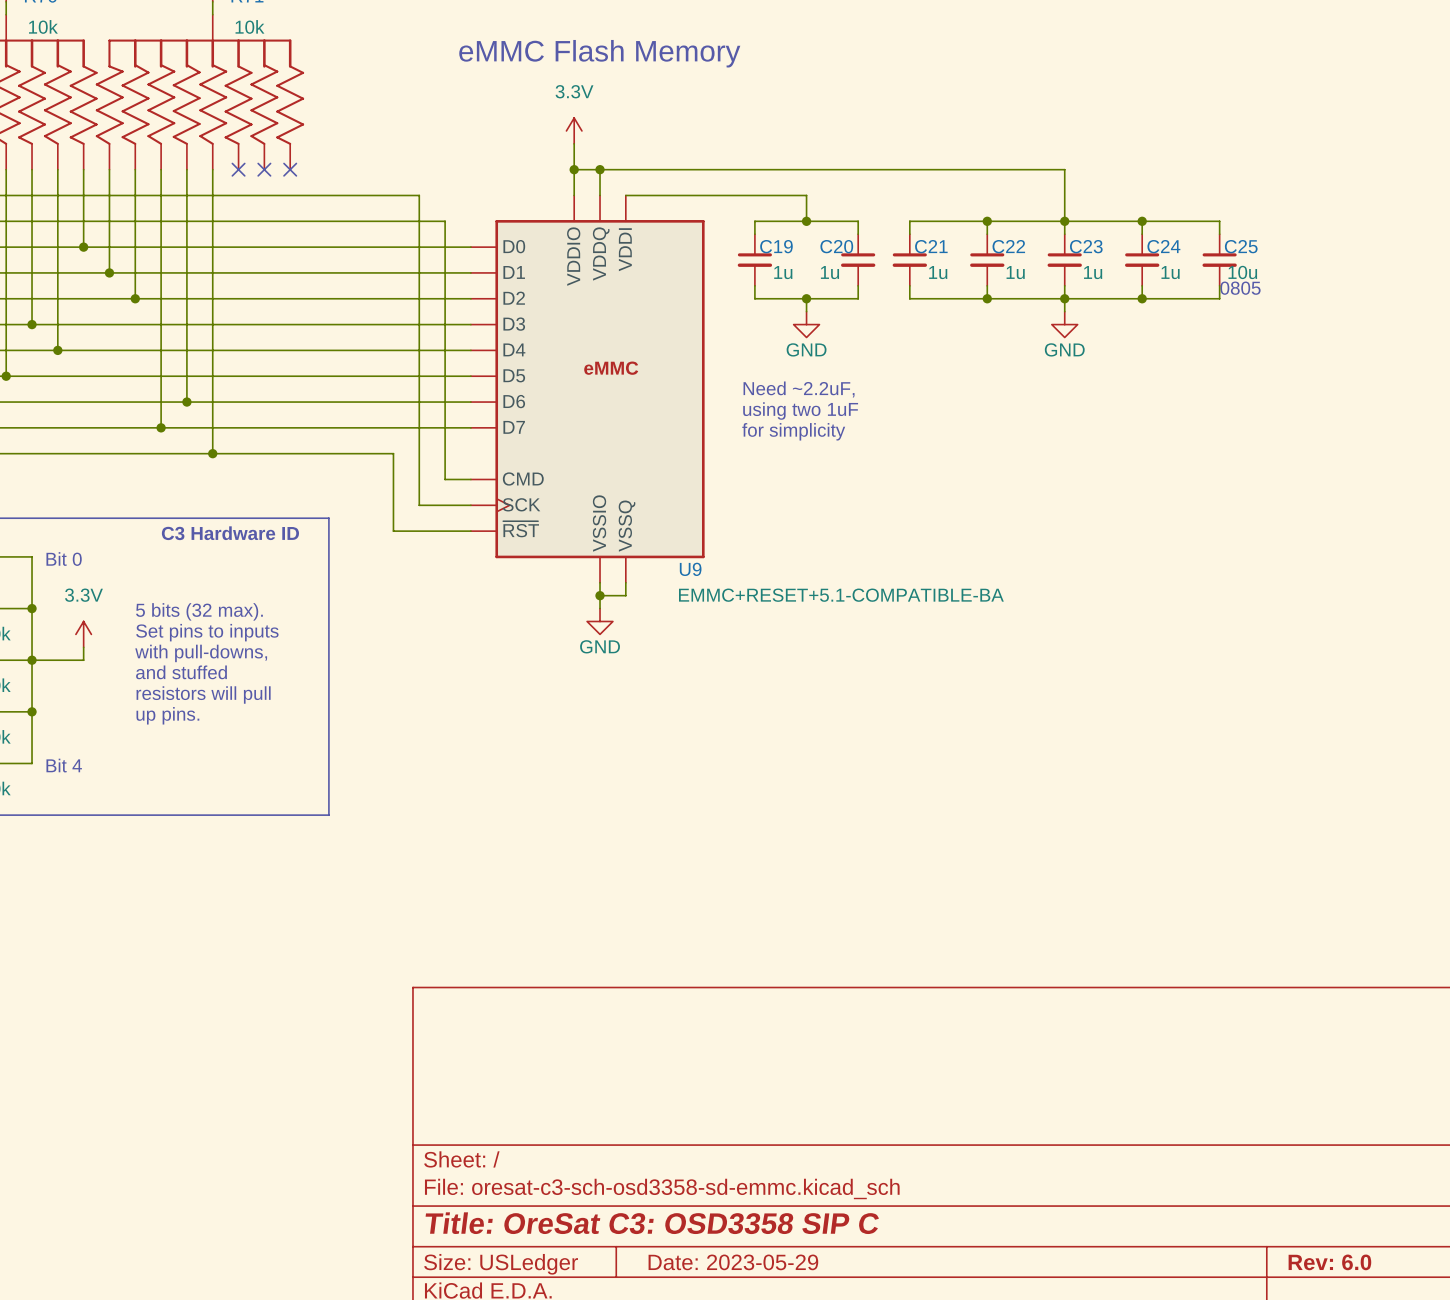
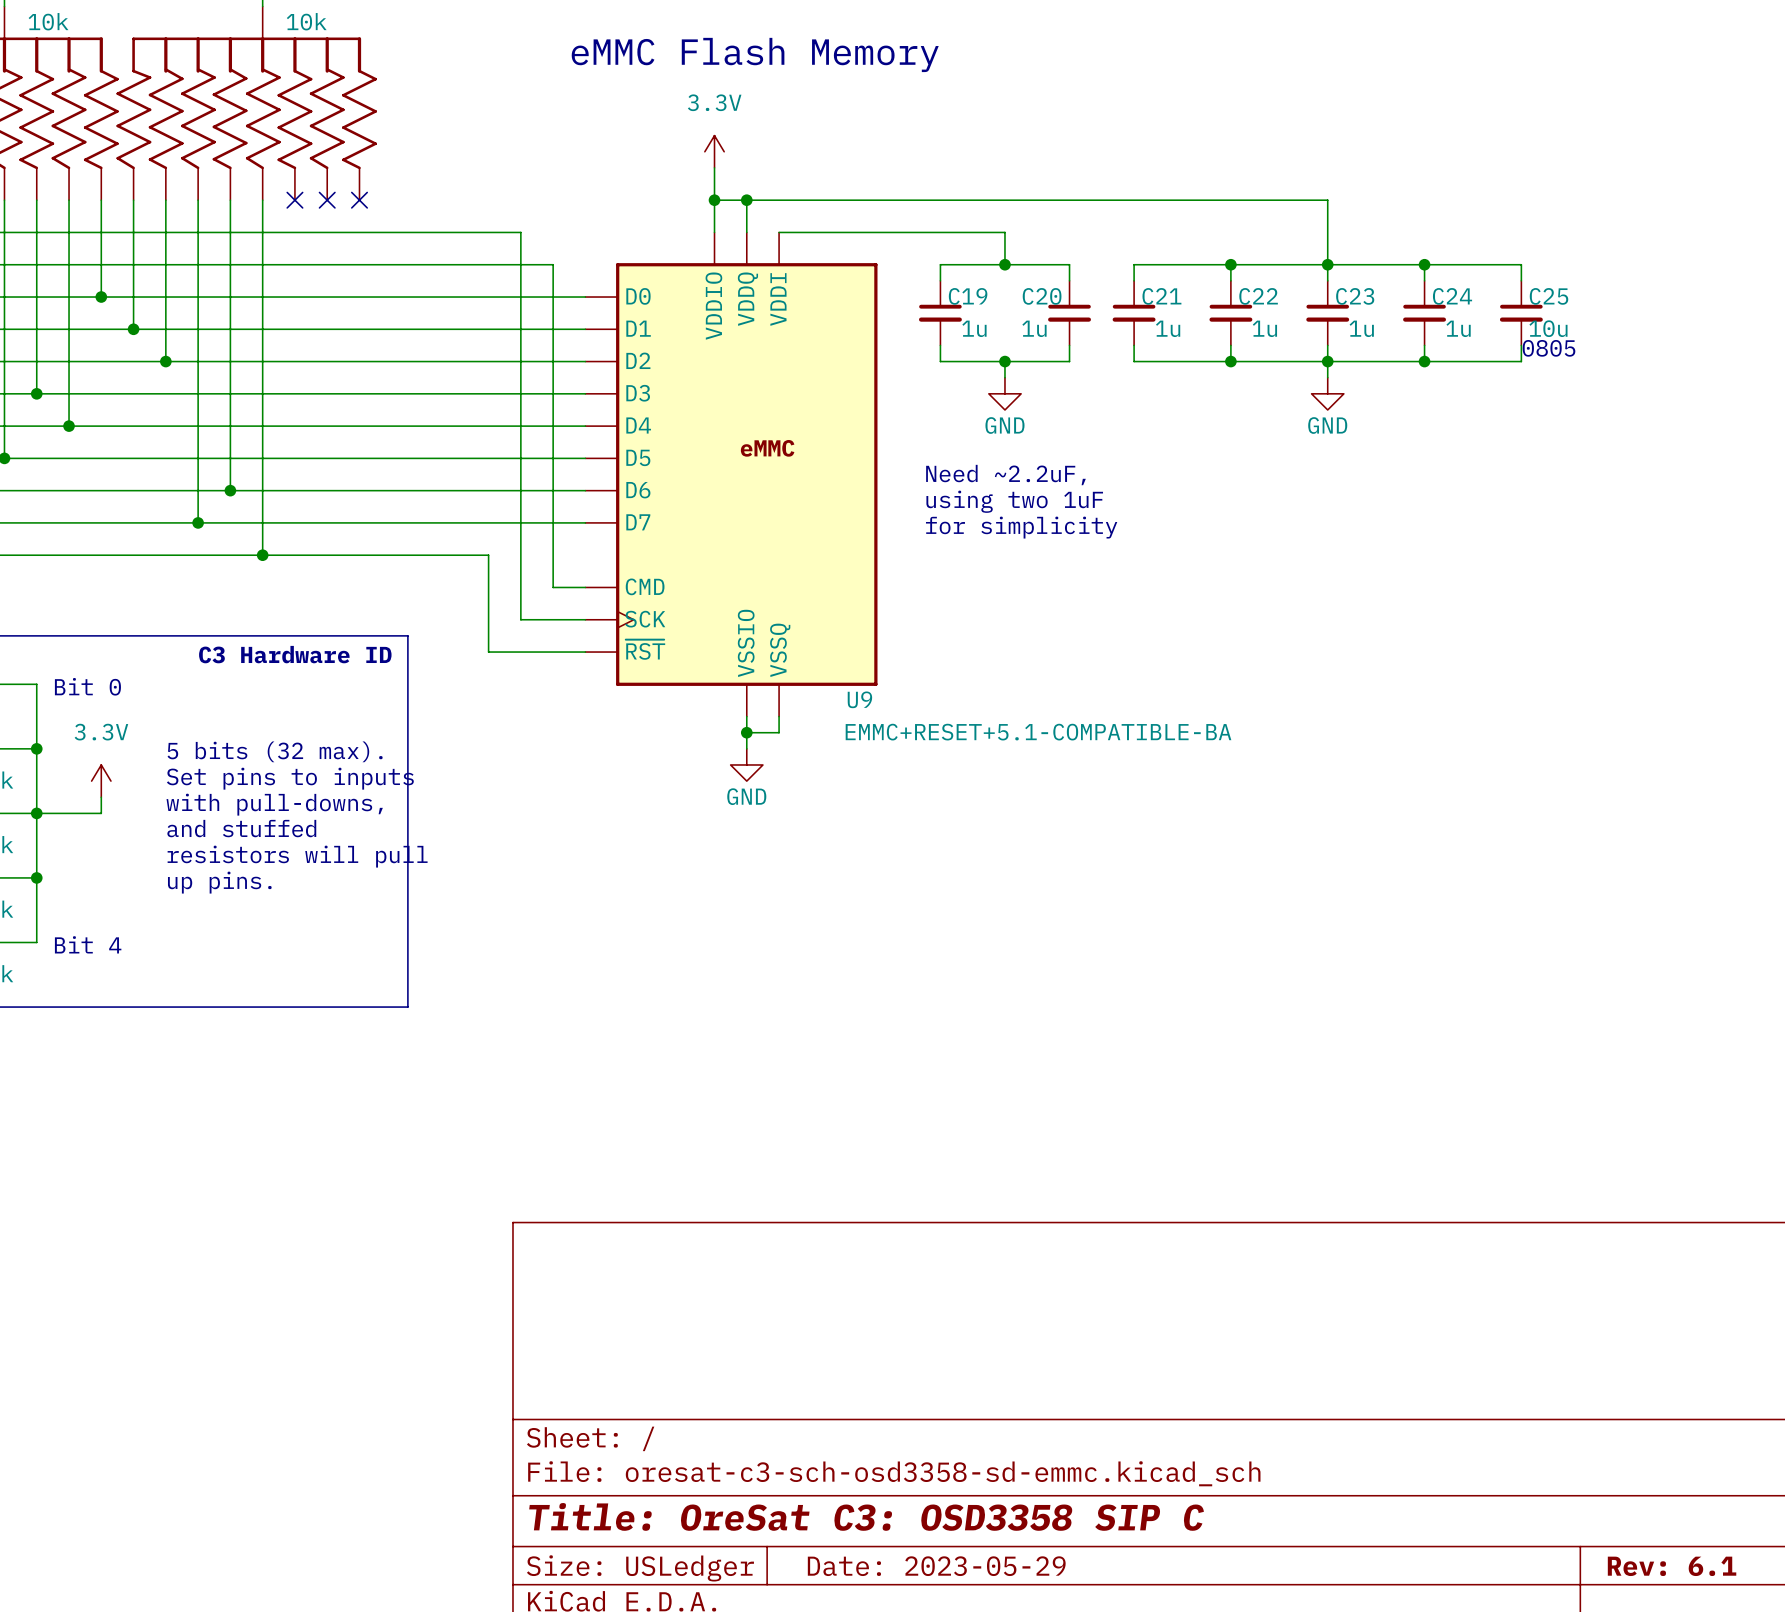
title block: Rev: 6.0 (1329, 1262) -> Rev: 6.1 (1672, 1566)

